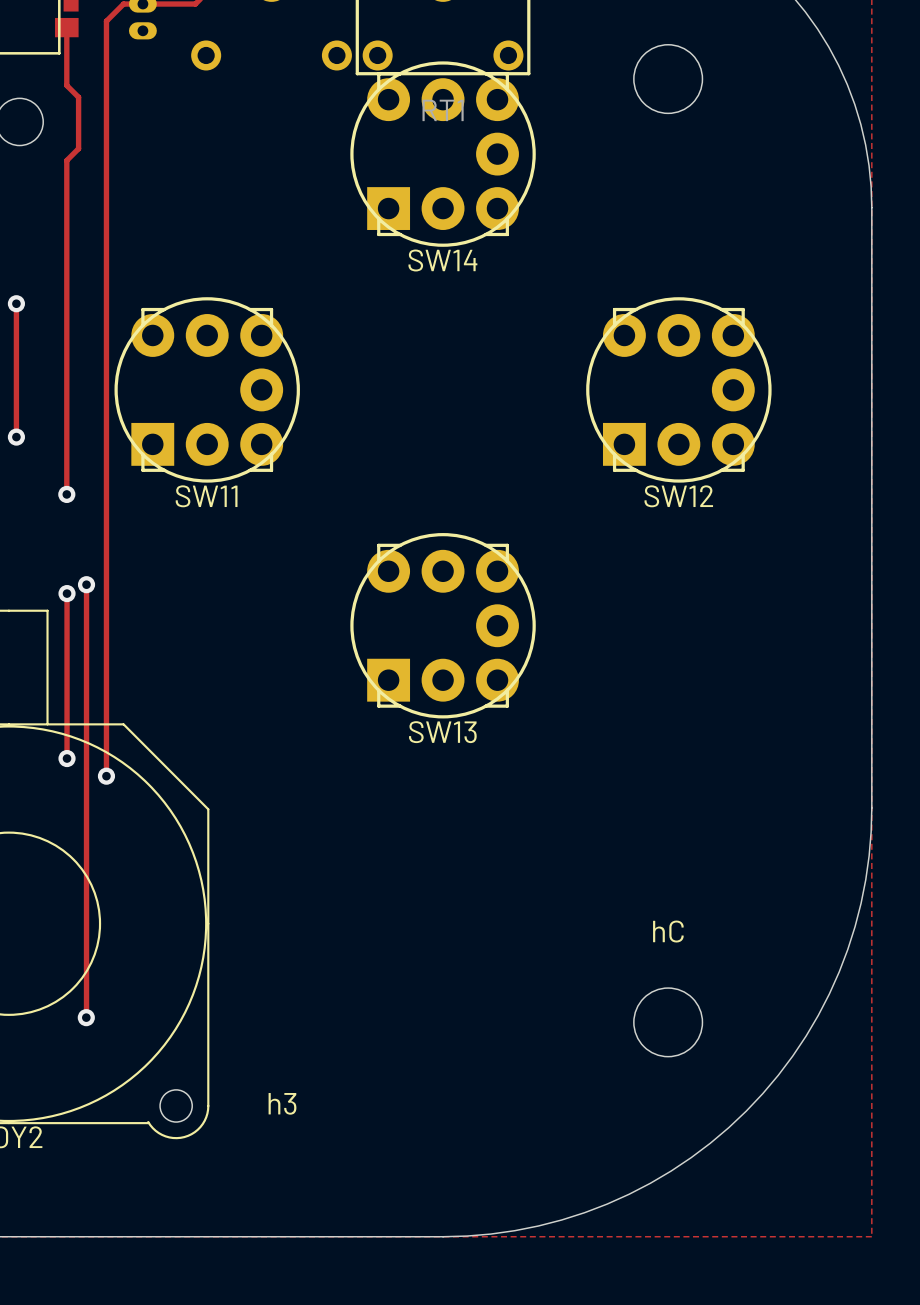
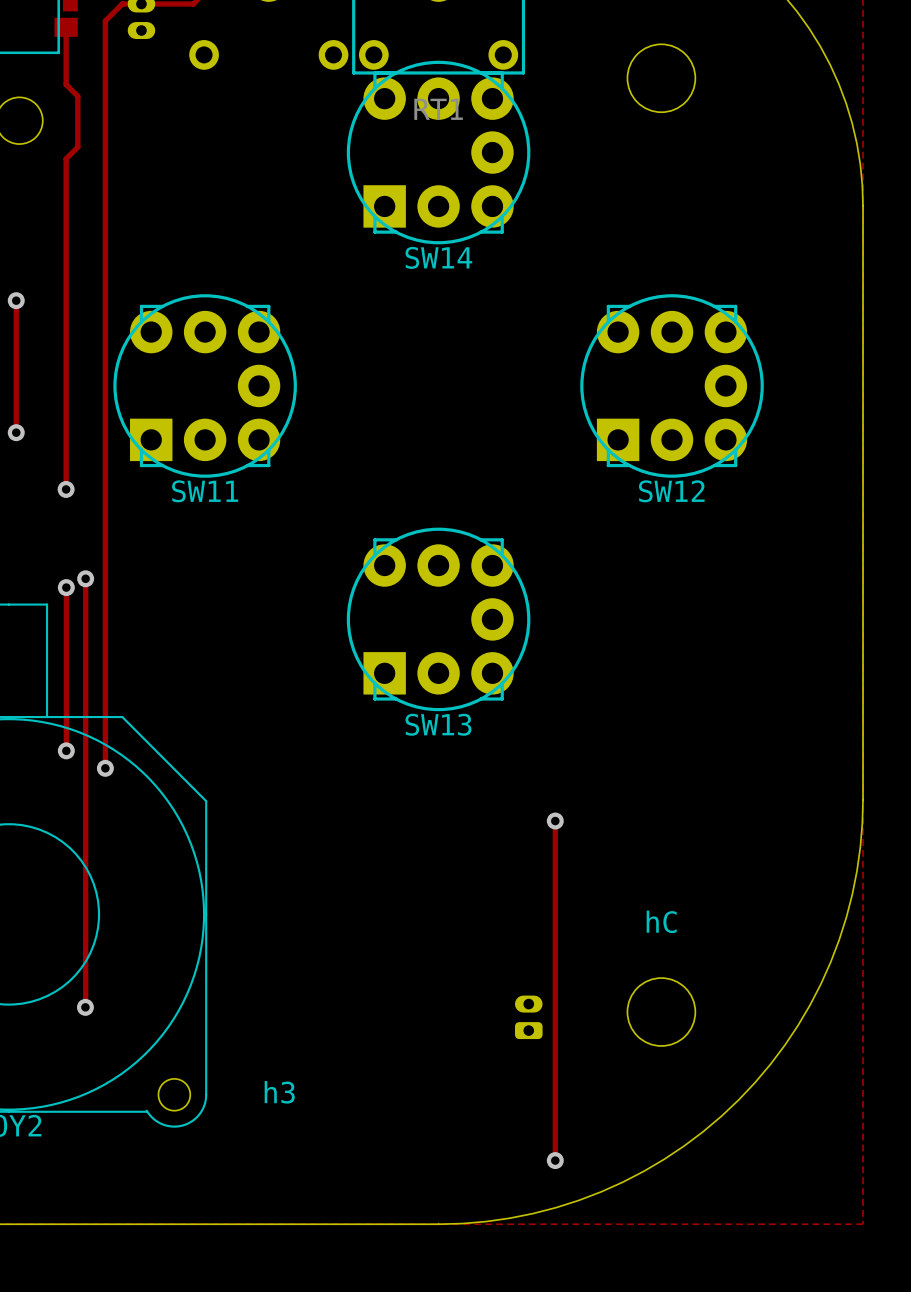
track: none -> (555, 821) (555, 1160)
via: none -> (555, 821)
part: none -> (528, 1017)
via: none -> (555, 1160)

